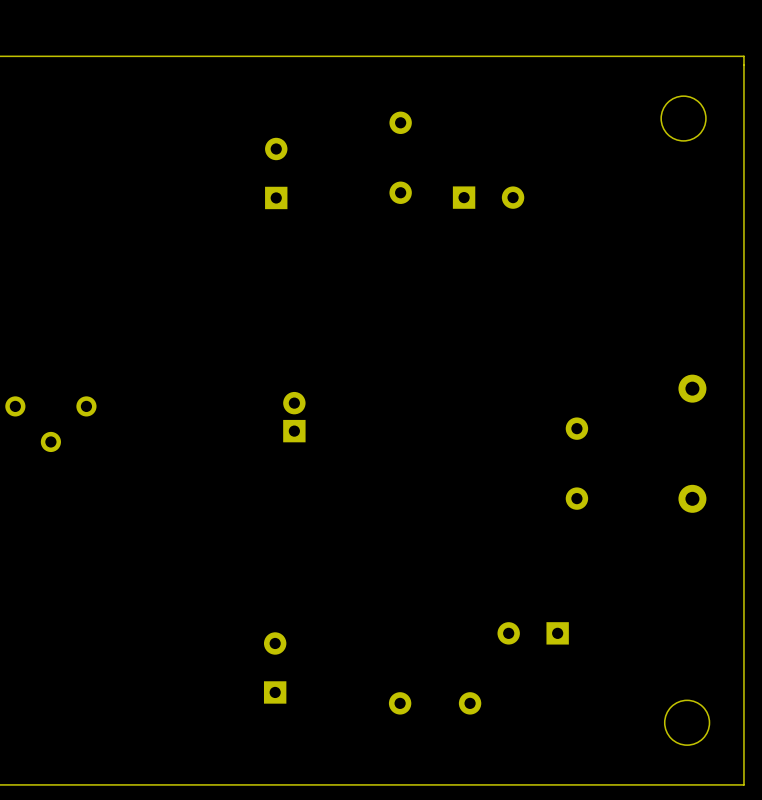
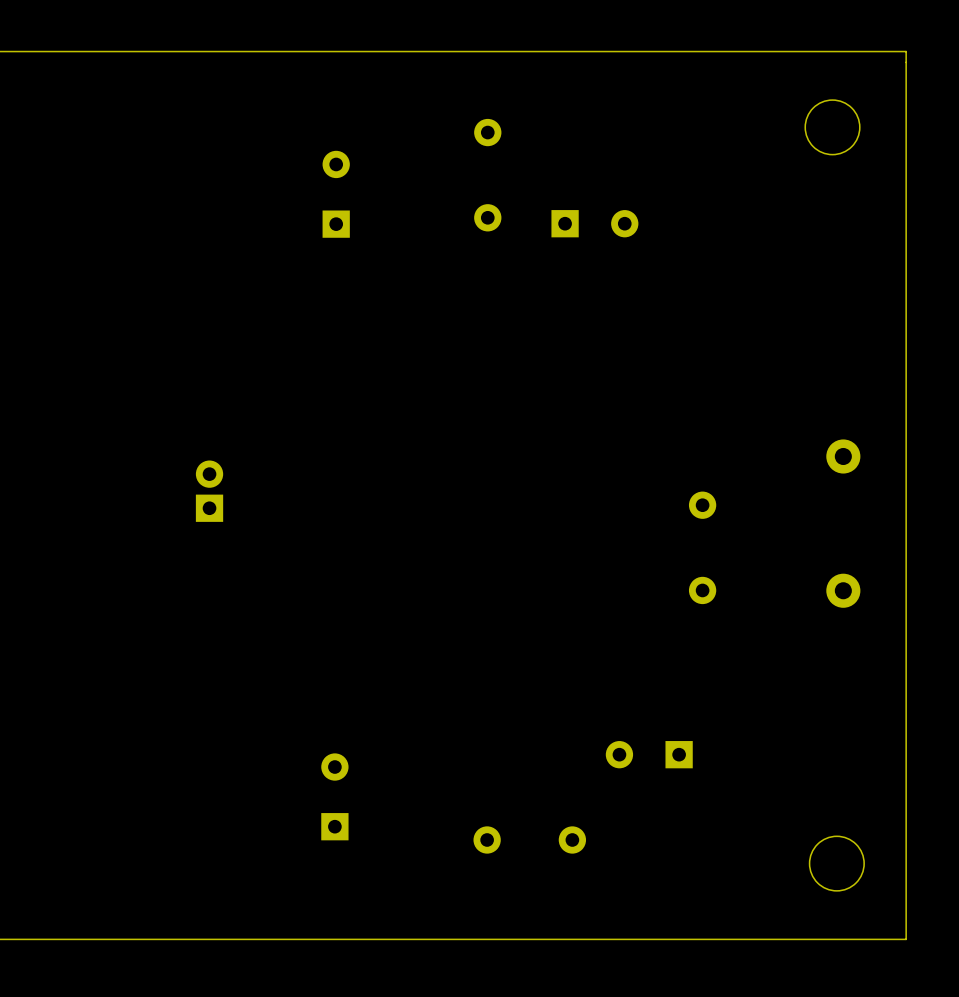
part position: (294, 417) -> (209, 491)
part: (50, 424) -> none

